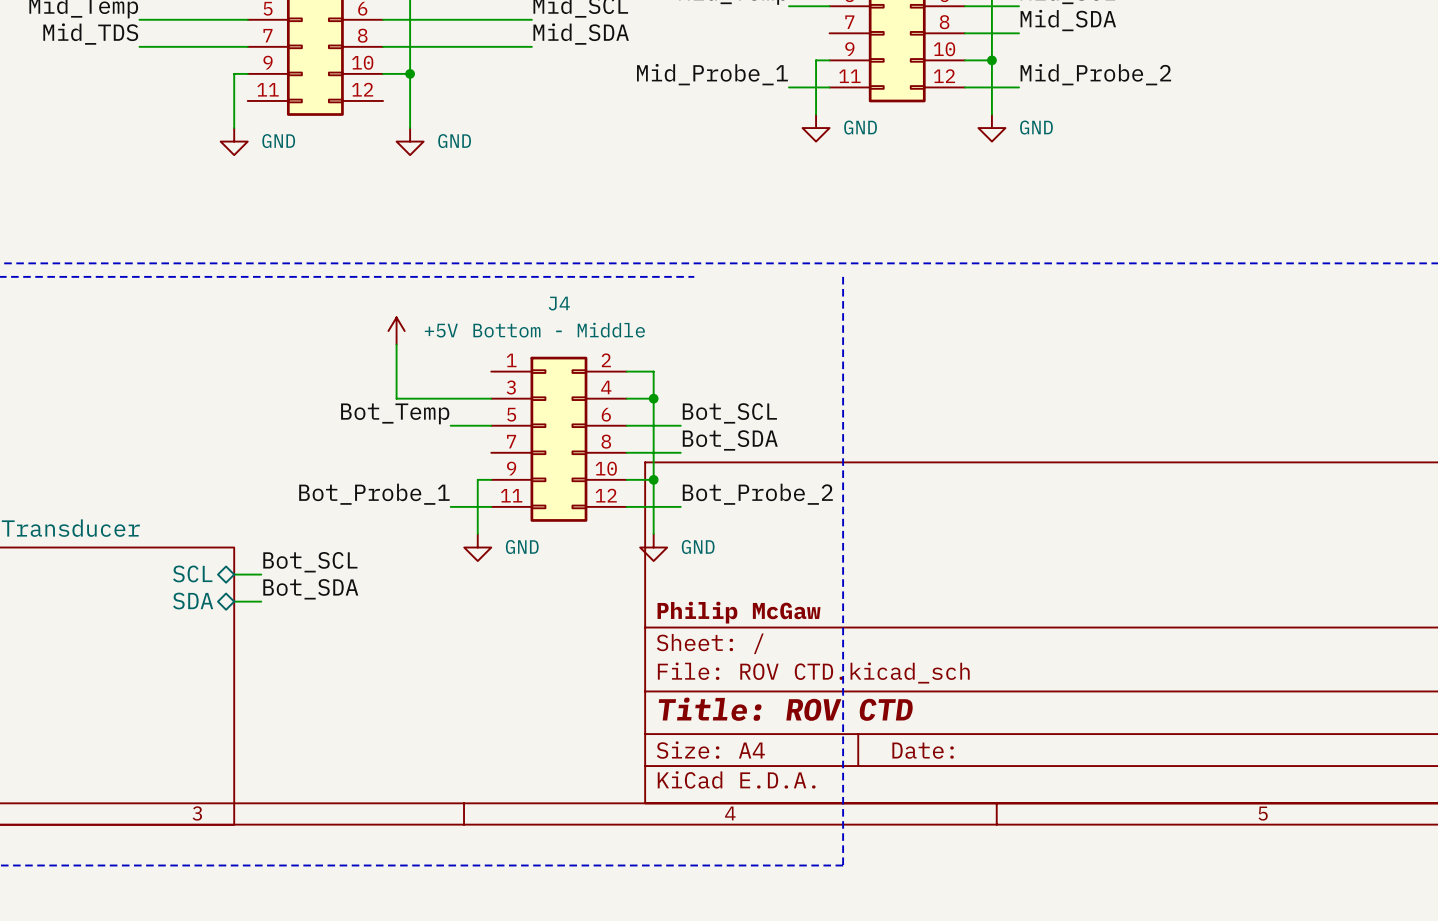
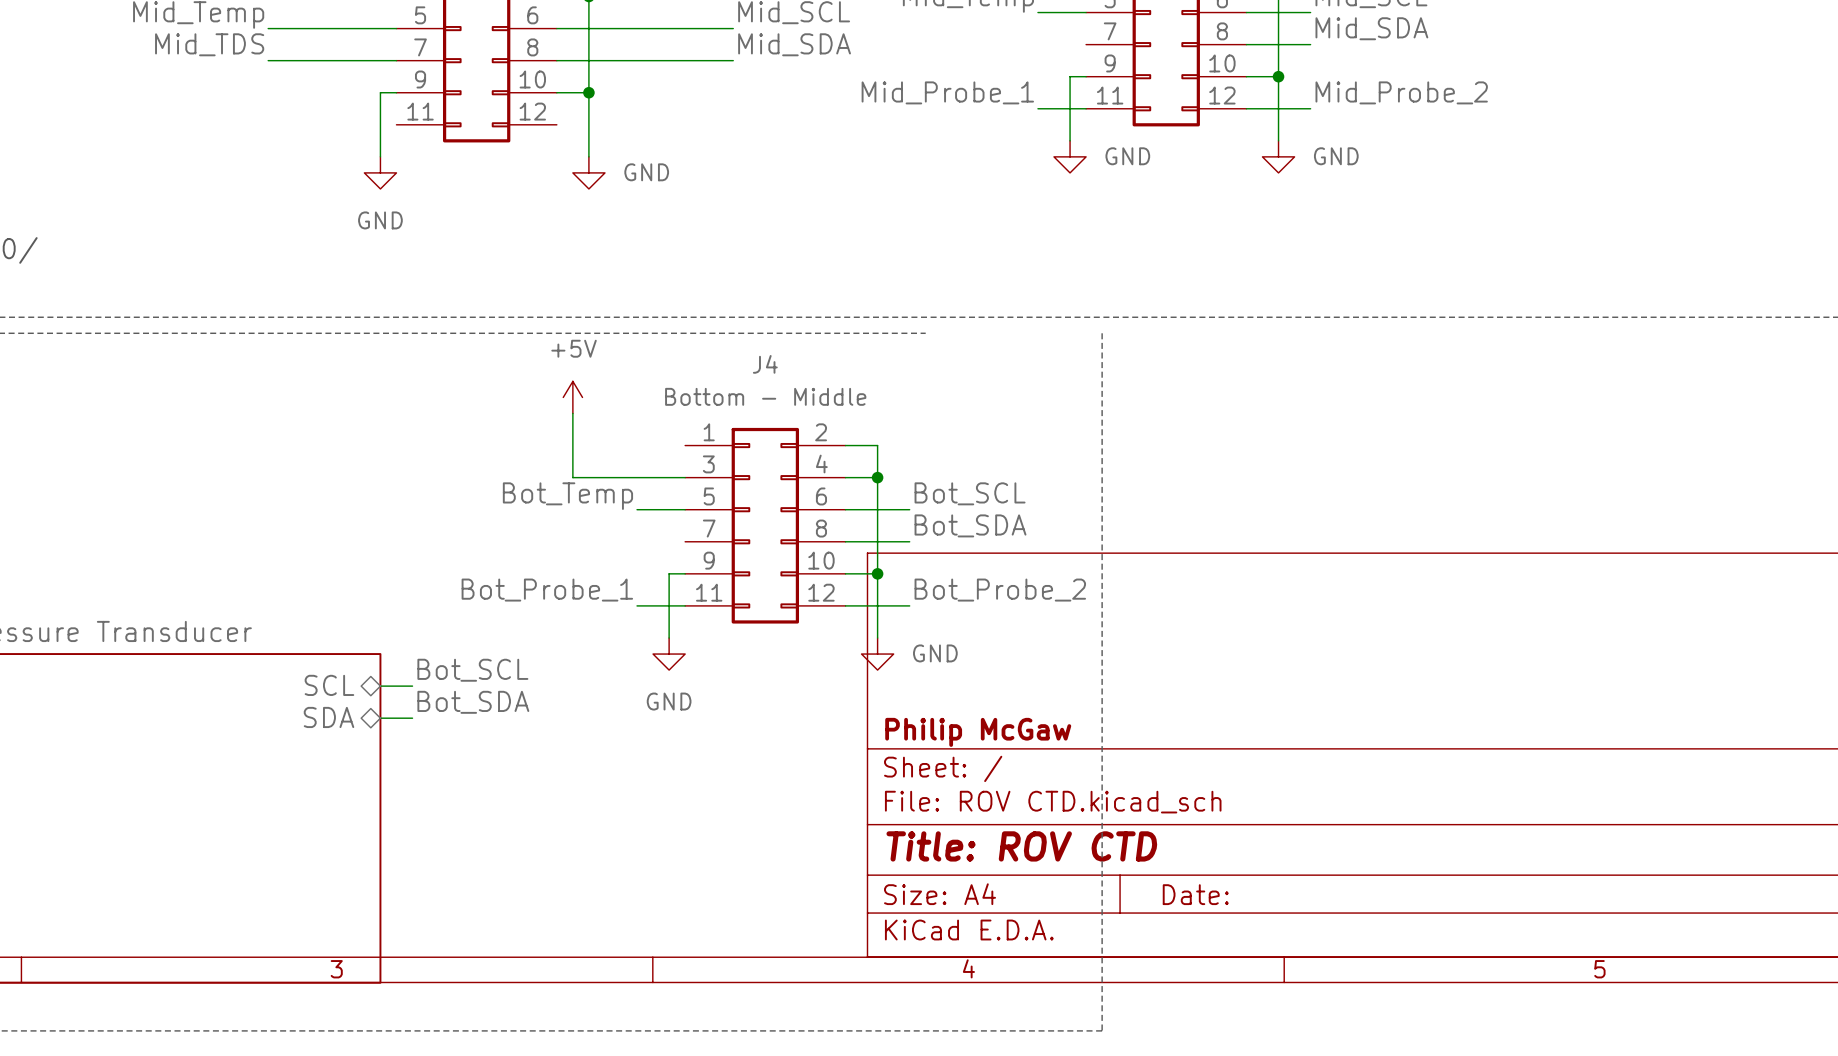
power symbol text position: GND (278, 141) -> GND (380, 220)
power symbol text position: +5V (441, 330) -> +5V (574, 348)
power symbol text position: GND (522, 547) -> GND (669, 701)

